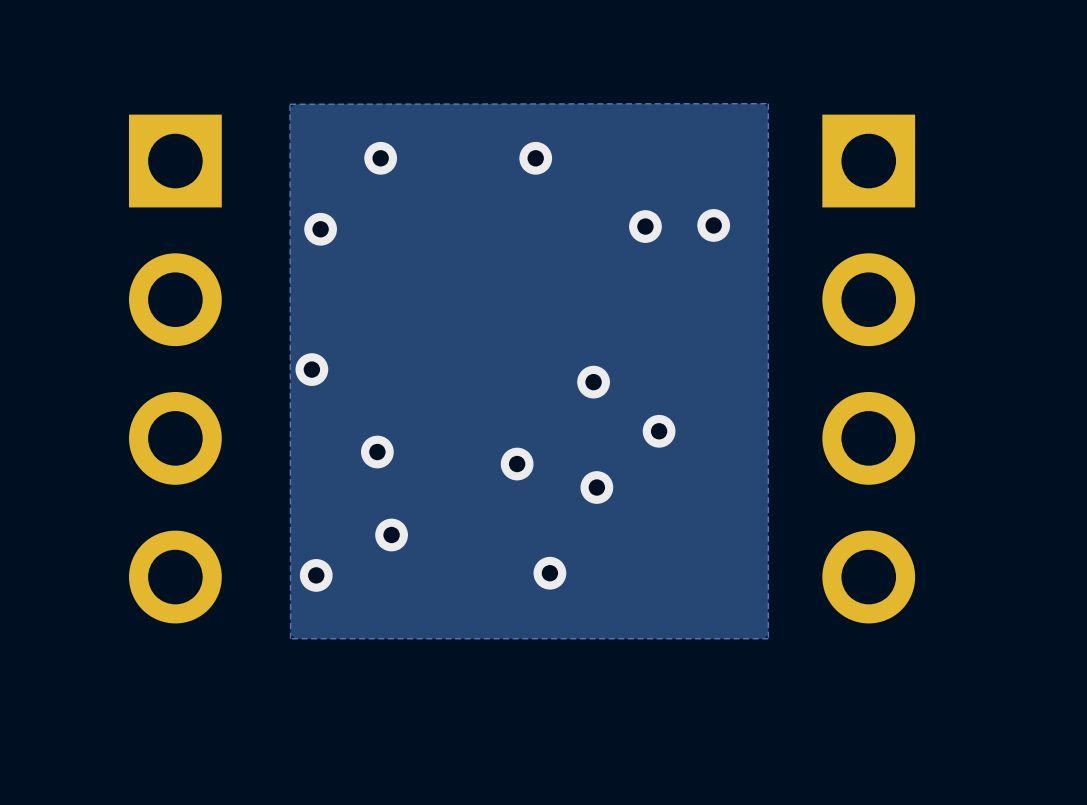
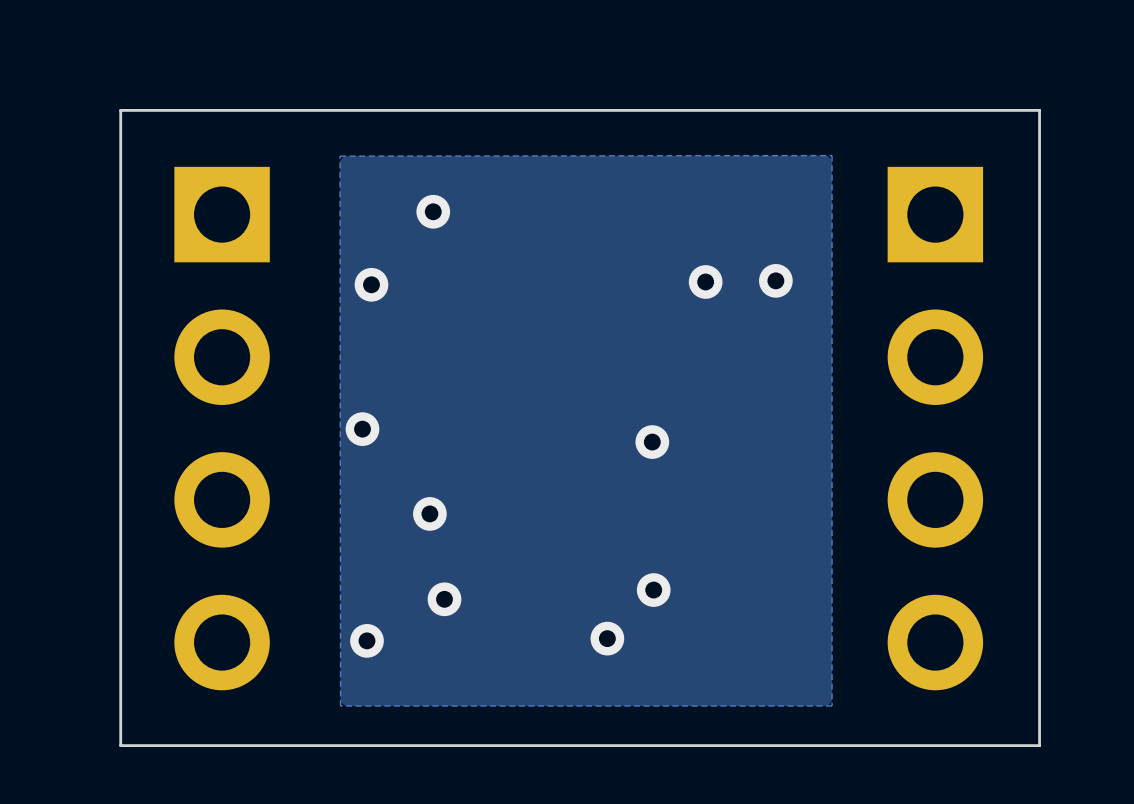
board edge: none -> (1039, 110) (120, 110) (120, 745) (1039, 745) (1039, 110)
via: (535, 158) -> none
via: (659, 431) -> none
via: (517, 464) -> none
via position: (596, 487) -> (653, 590)

